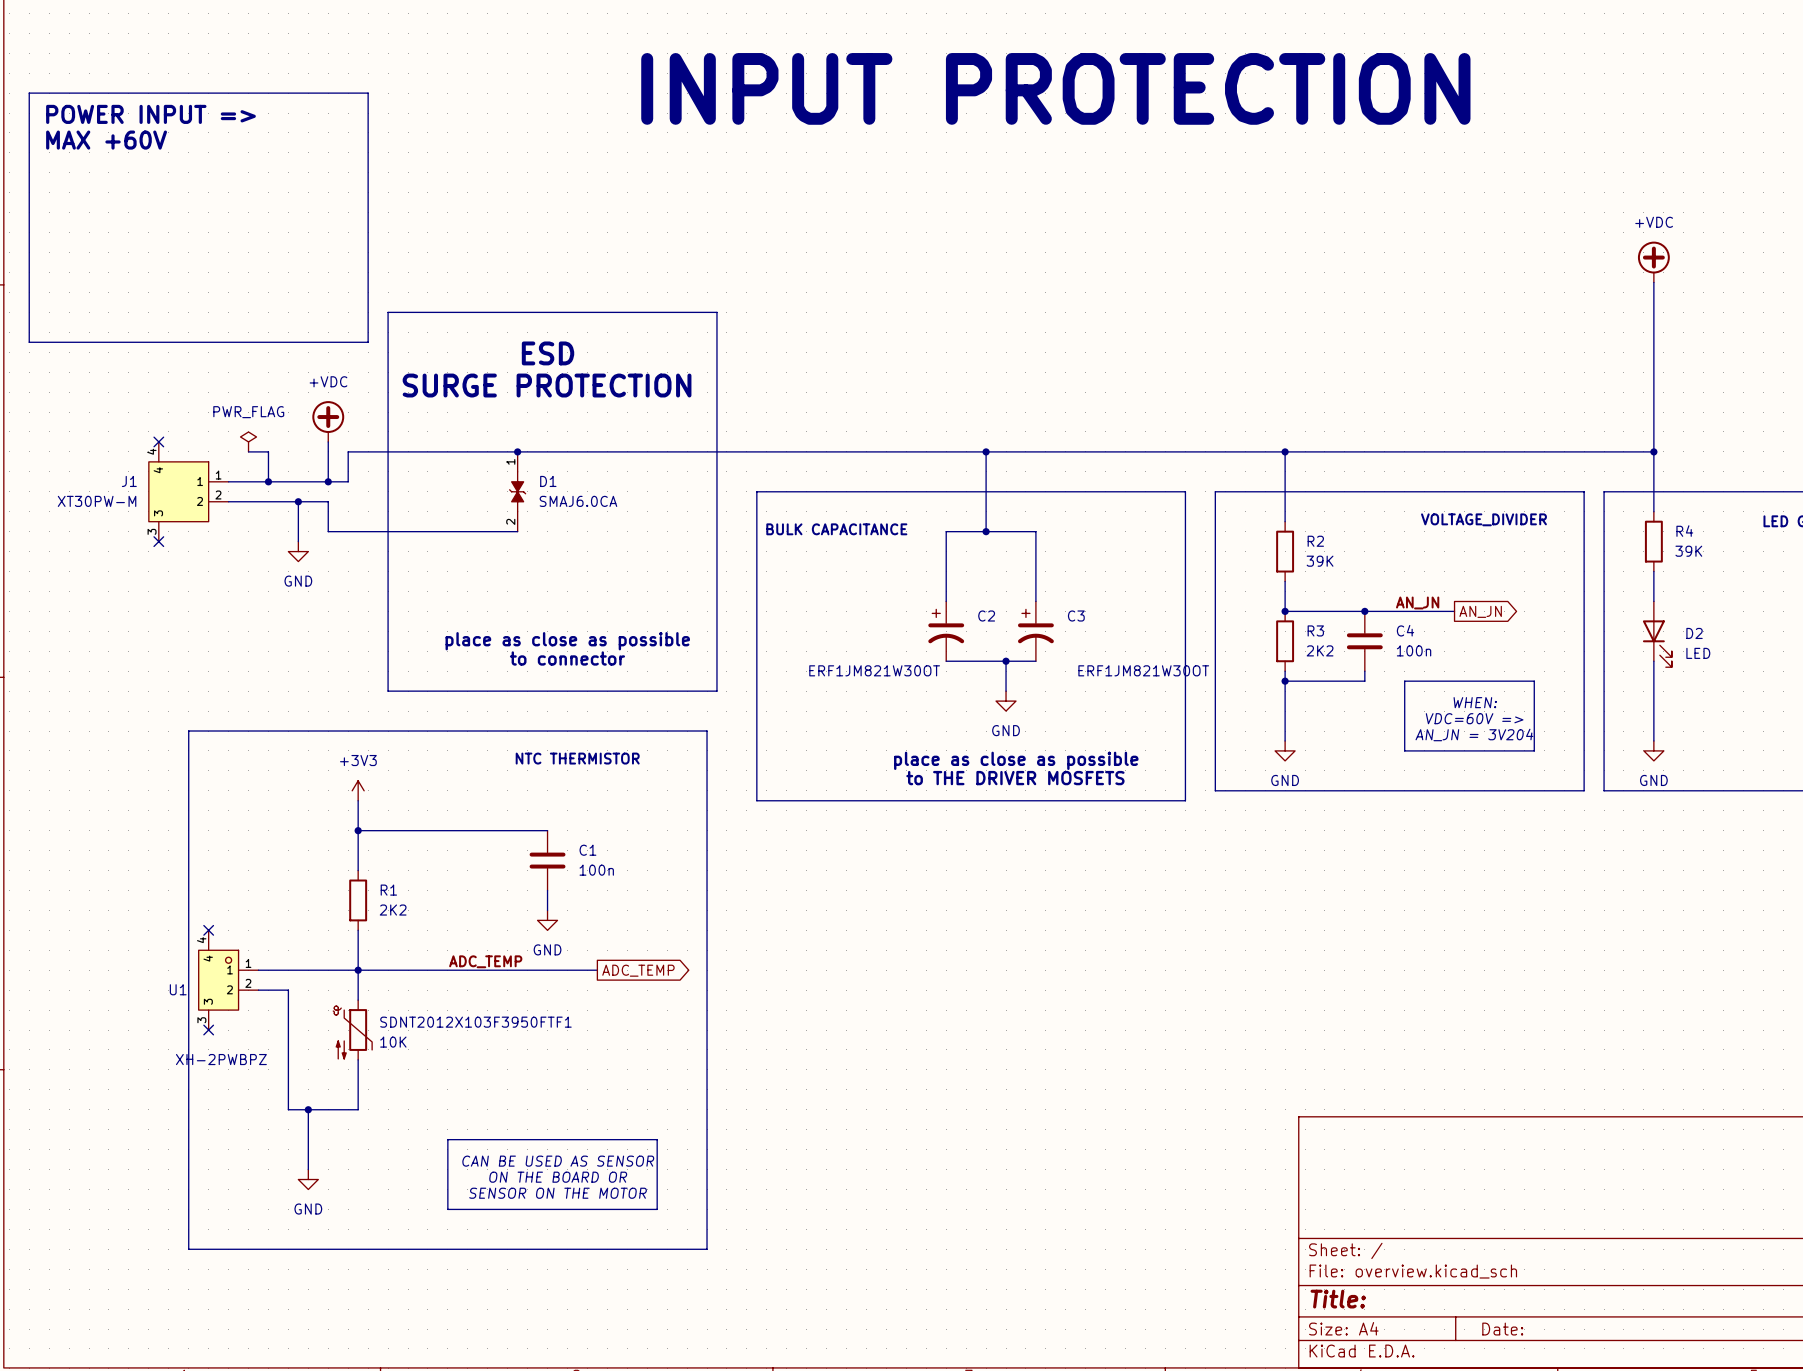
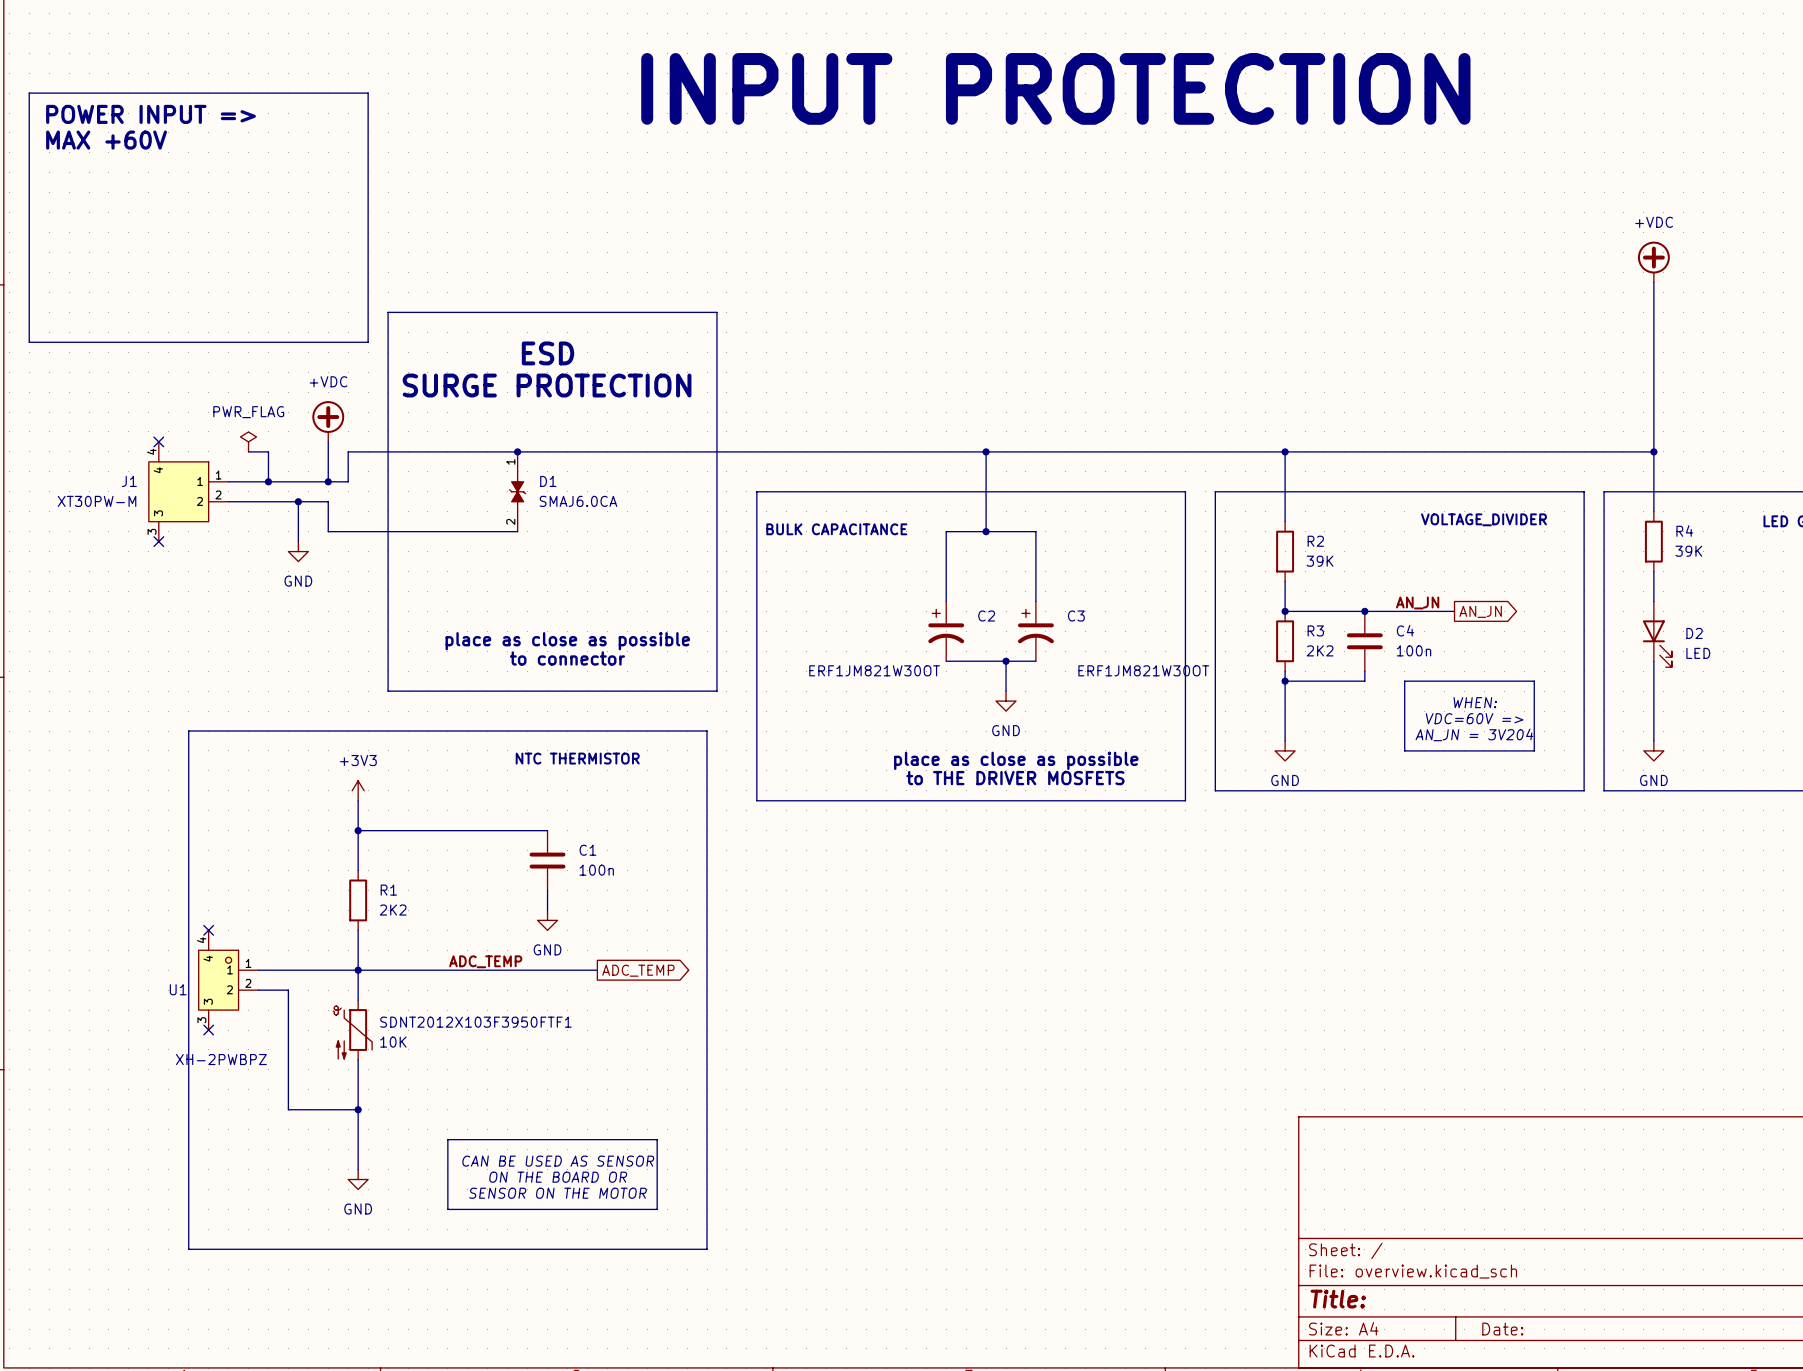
wire: (308, 1109) (308, 1169) -> (358, 1109) (358, 1169)
junction: (308, 1109) -> none
junction: none -> (358, 1109)
power symbol position: GND (308, 1179) -> GND (358, 1179)

